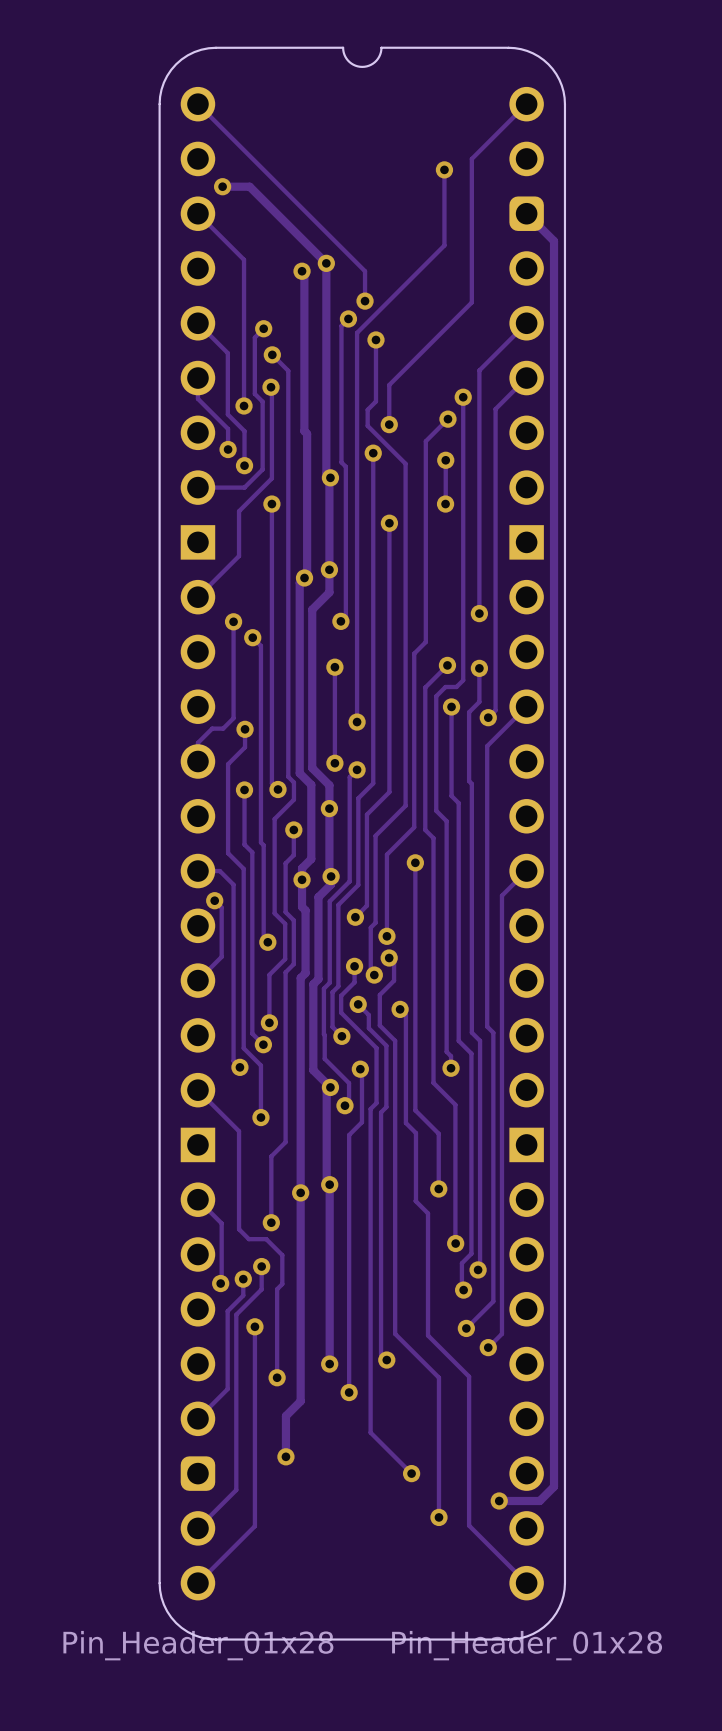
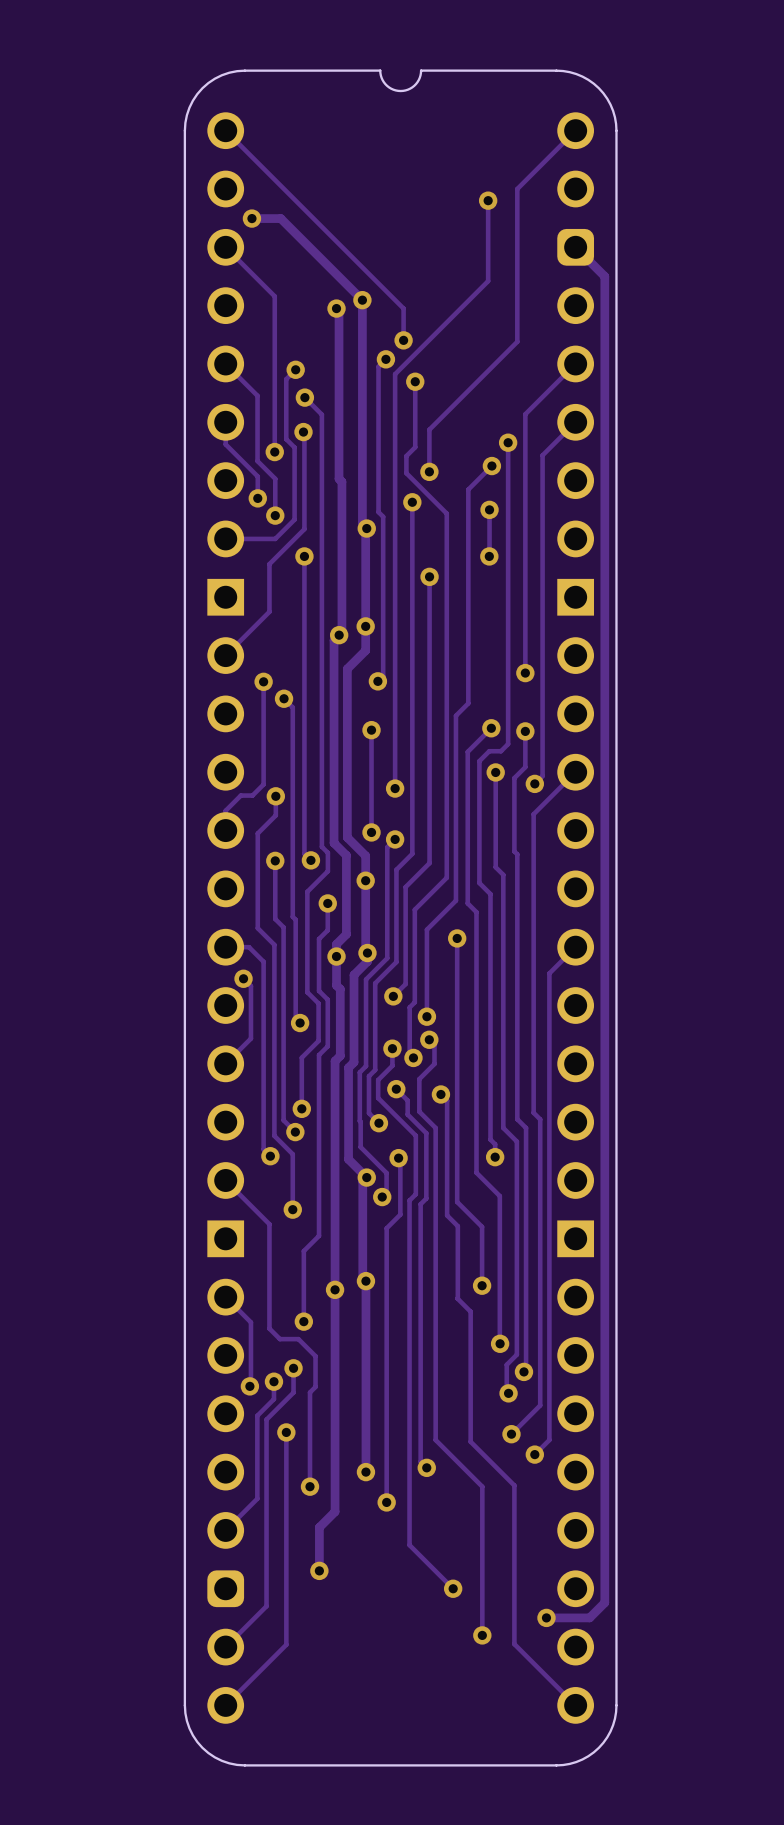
drawing: [63, 1630, 663, 1661] -> none

